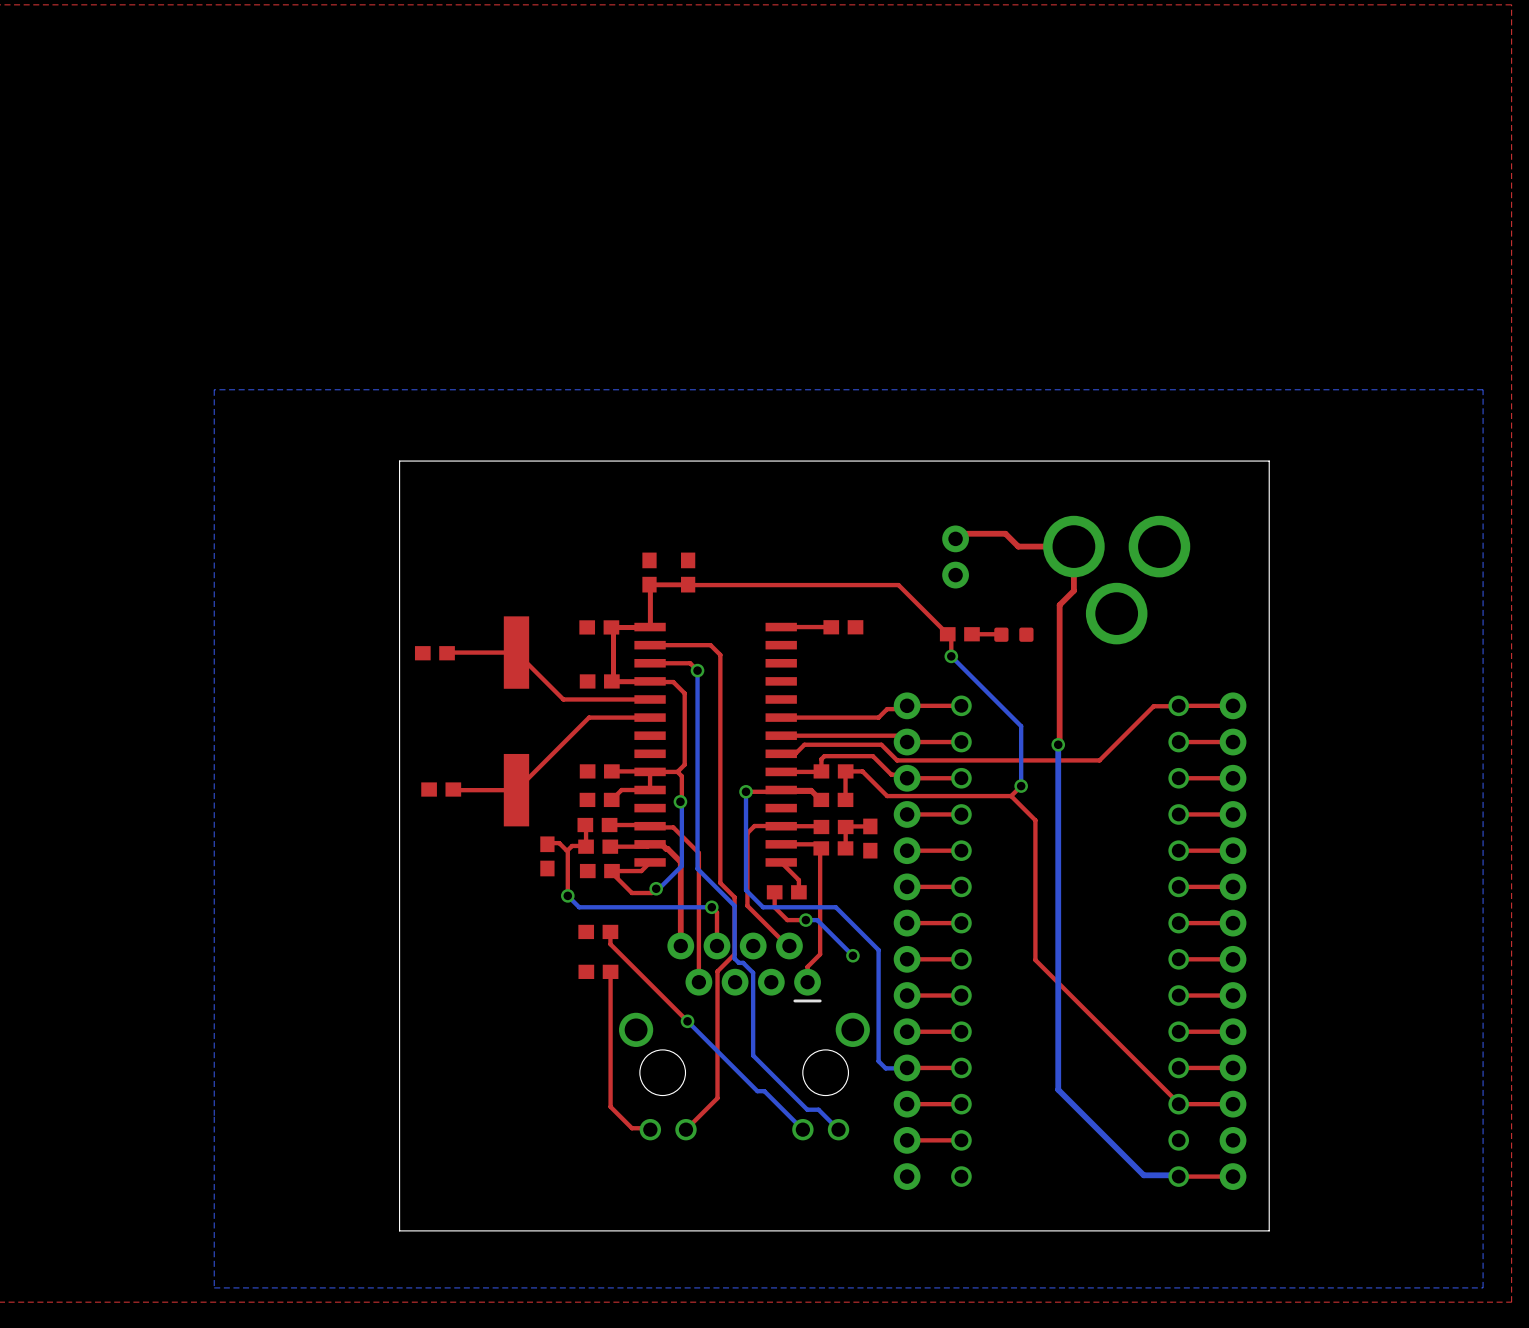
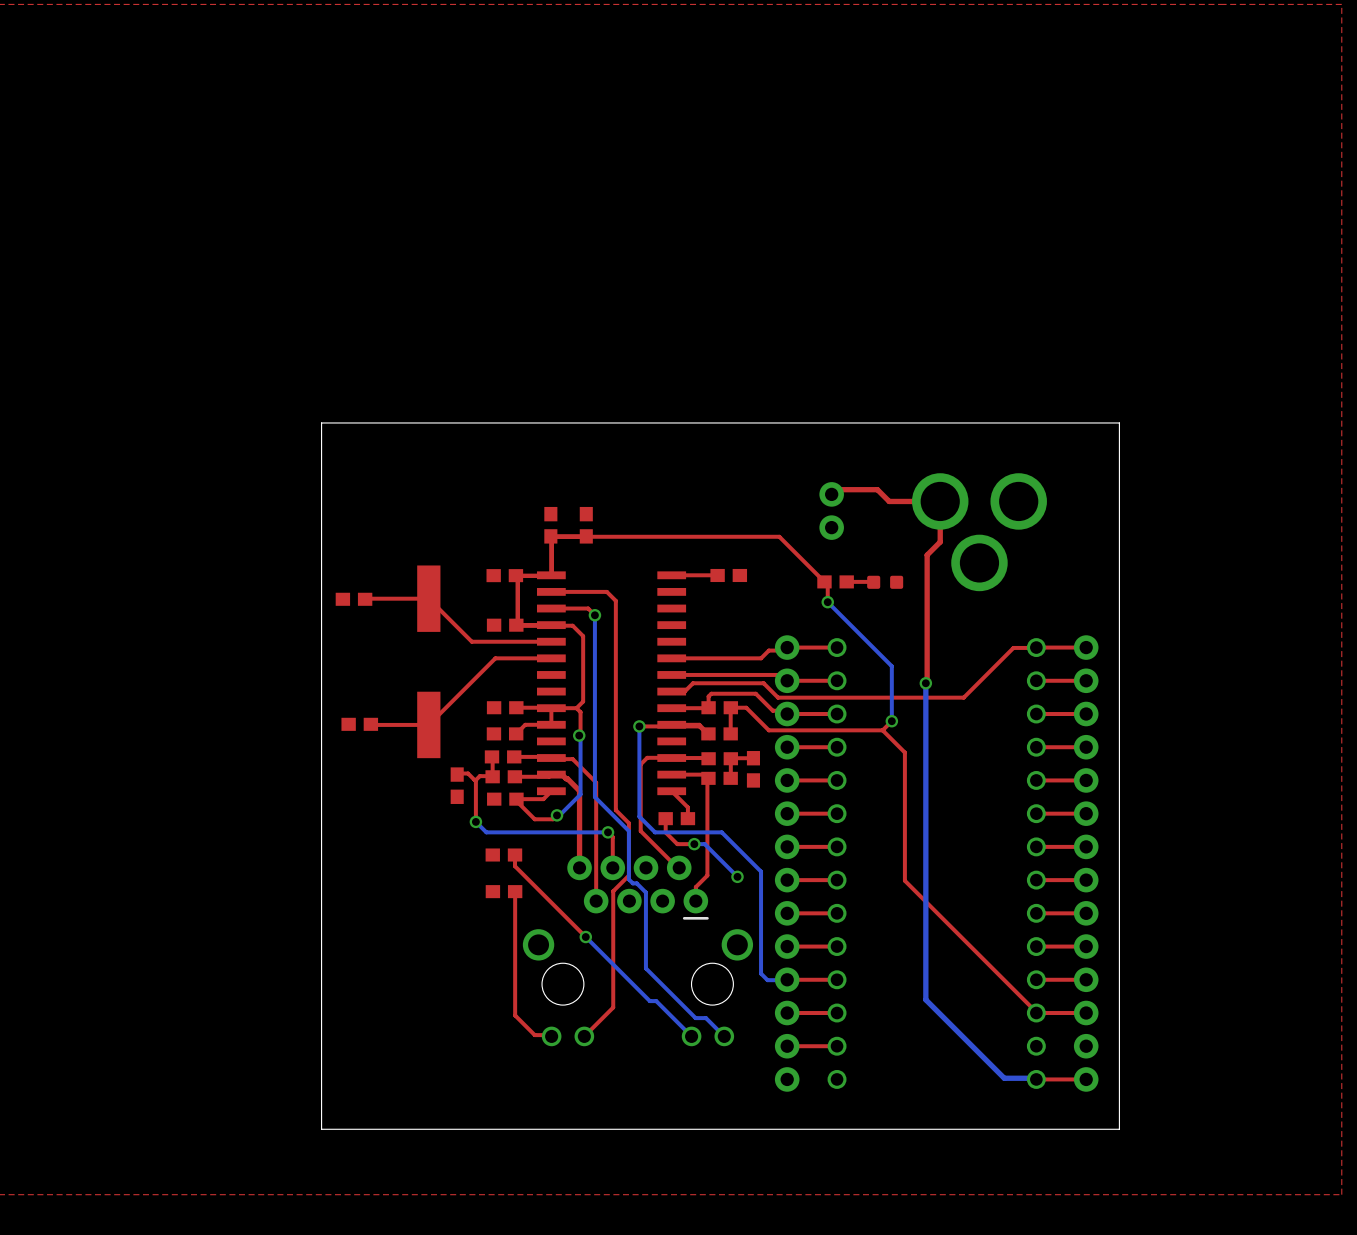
bottom zone outline: (1483, 389) (214, 389) (214, 1287) (1483, 1287) (1483, 389) -> none

